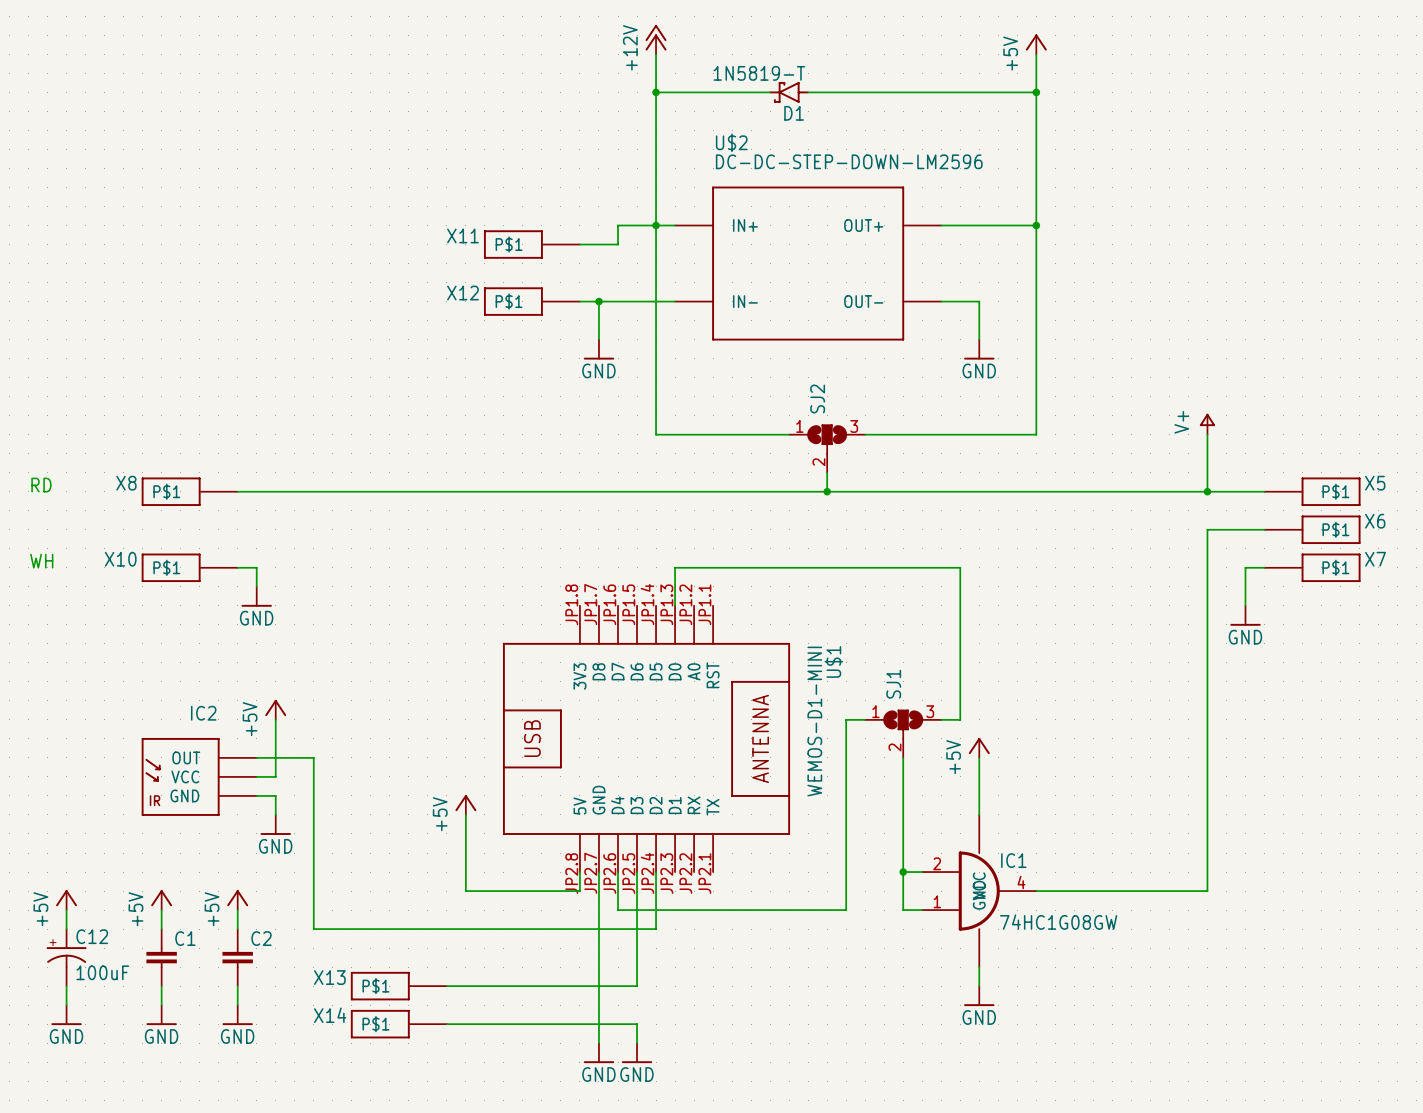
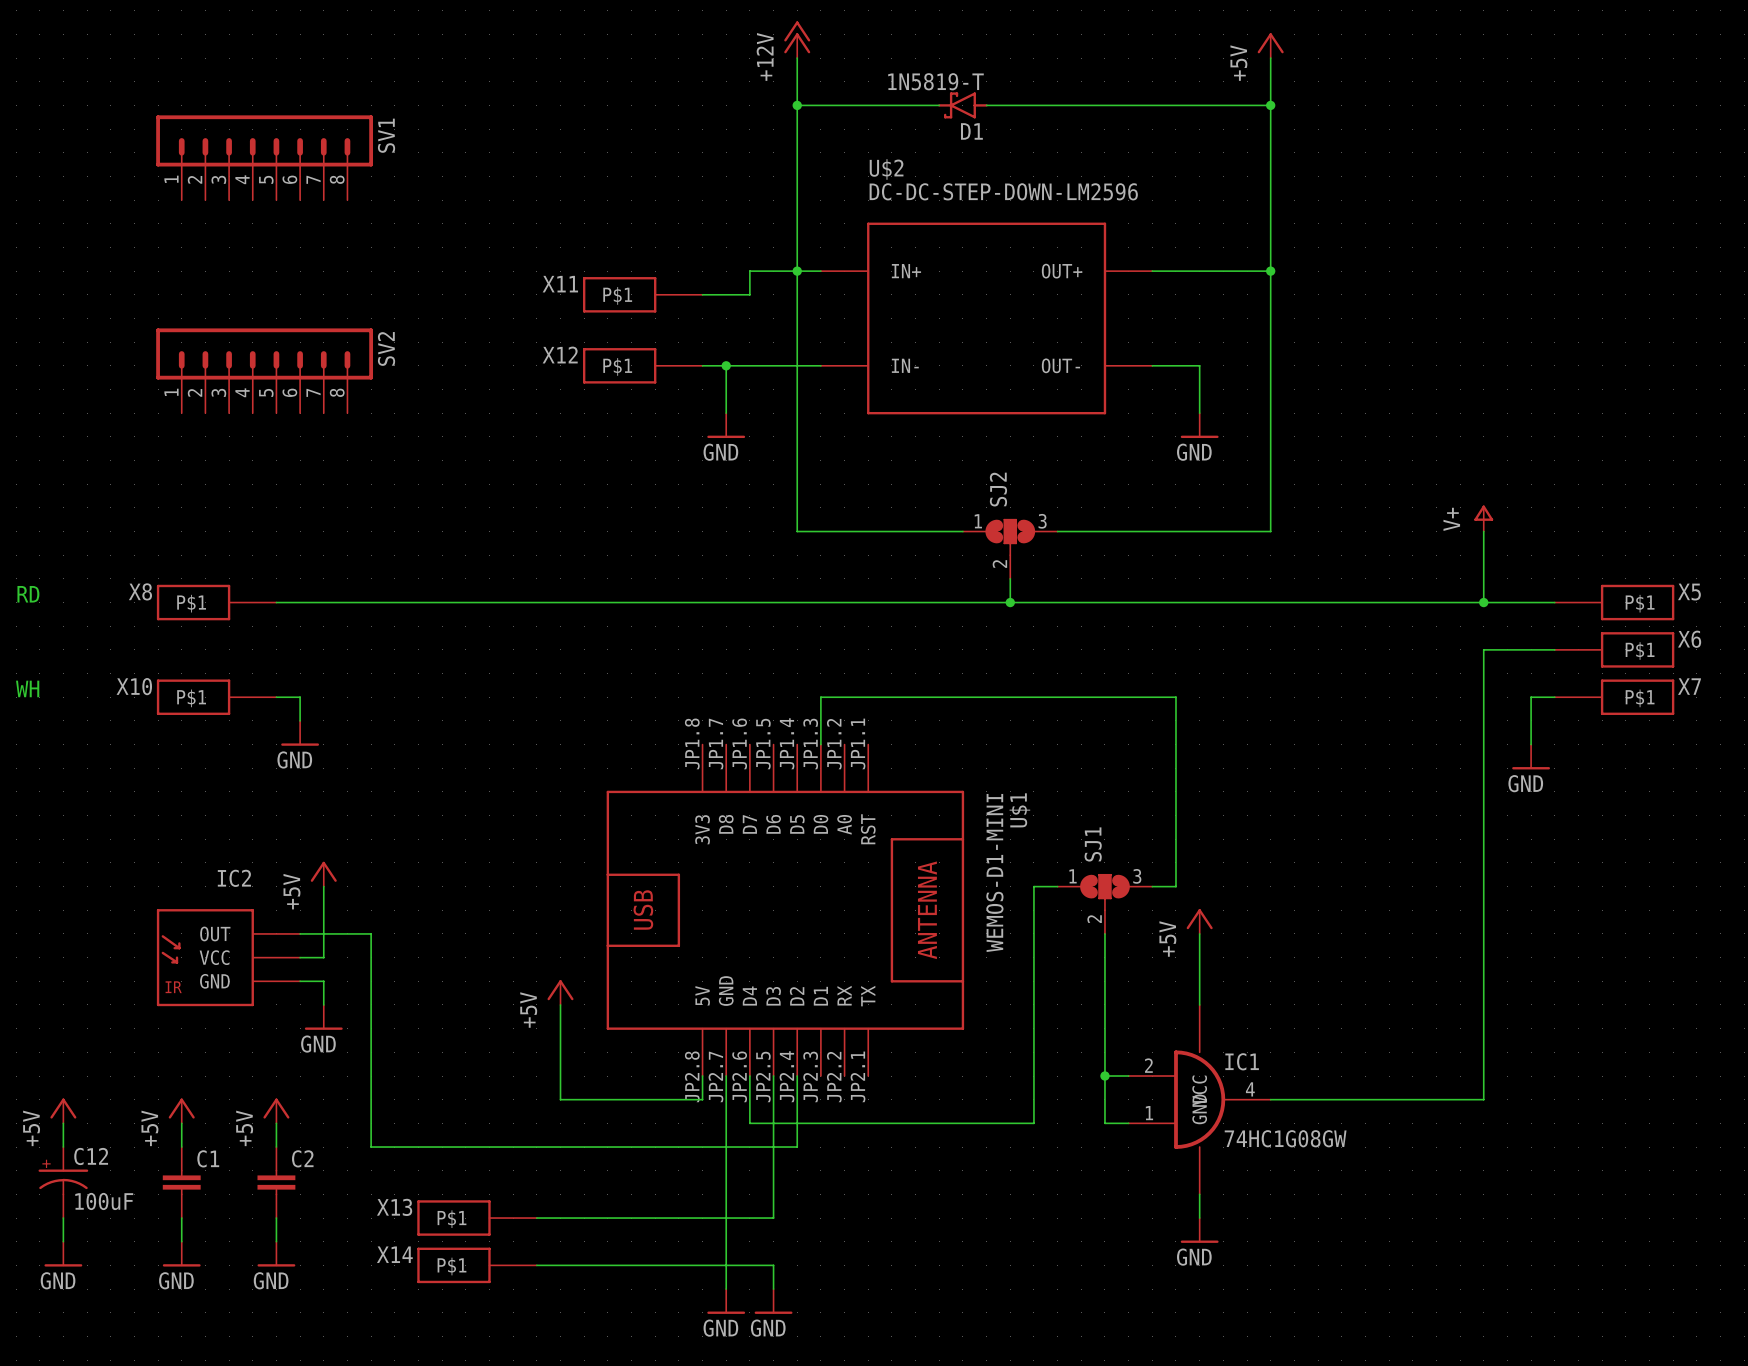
SV1: none -> (264, 157)
SV2: none -> (264, 370)

